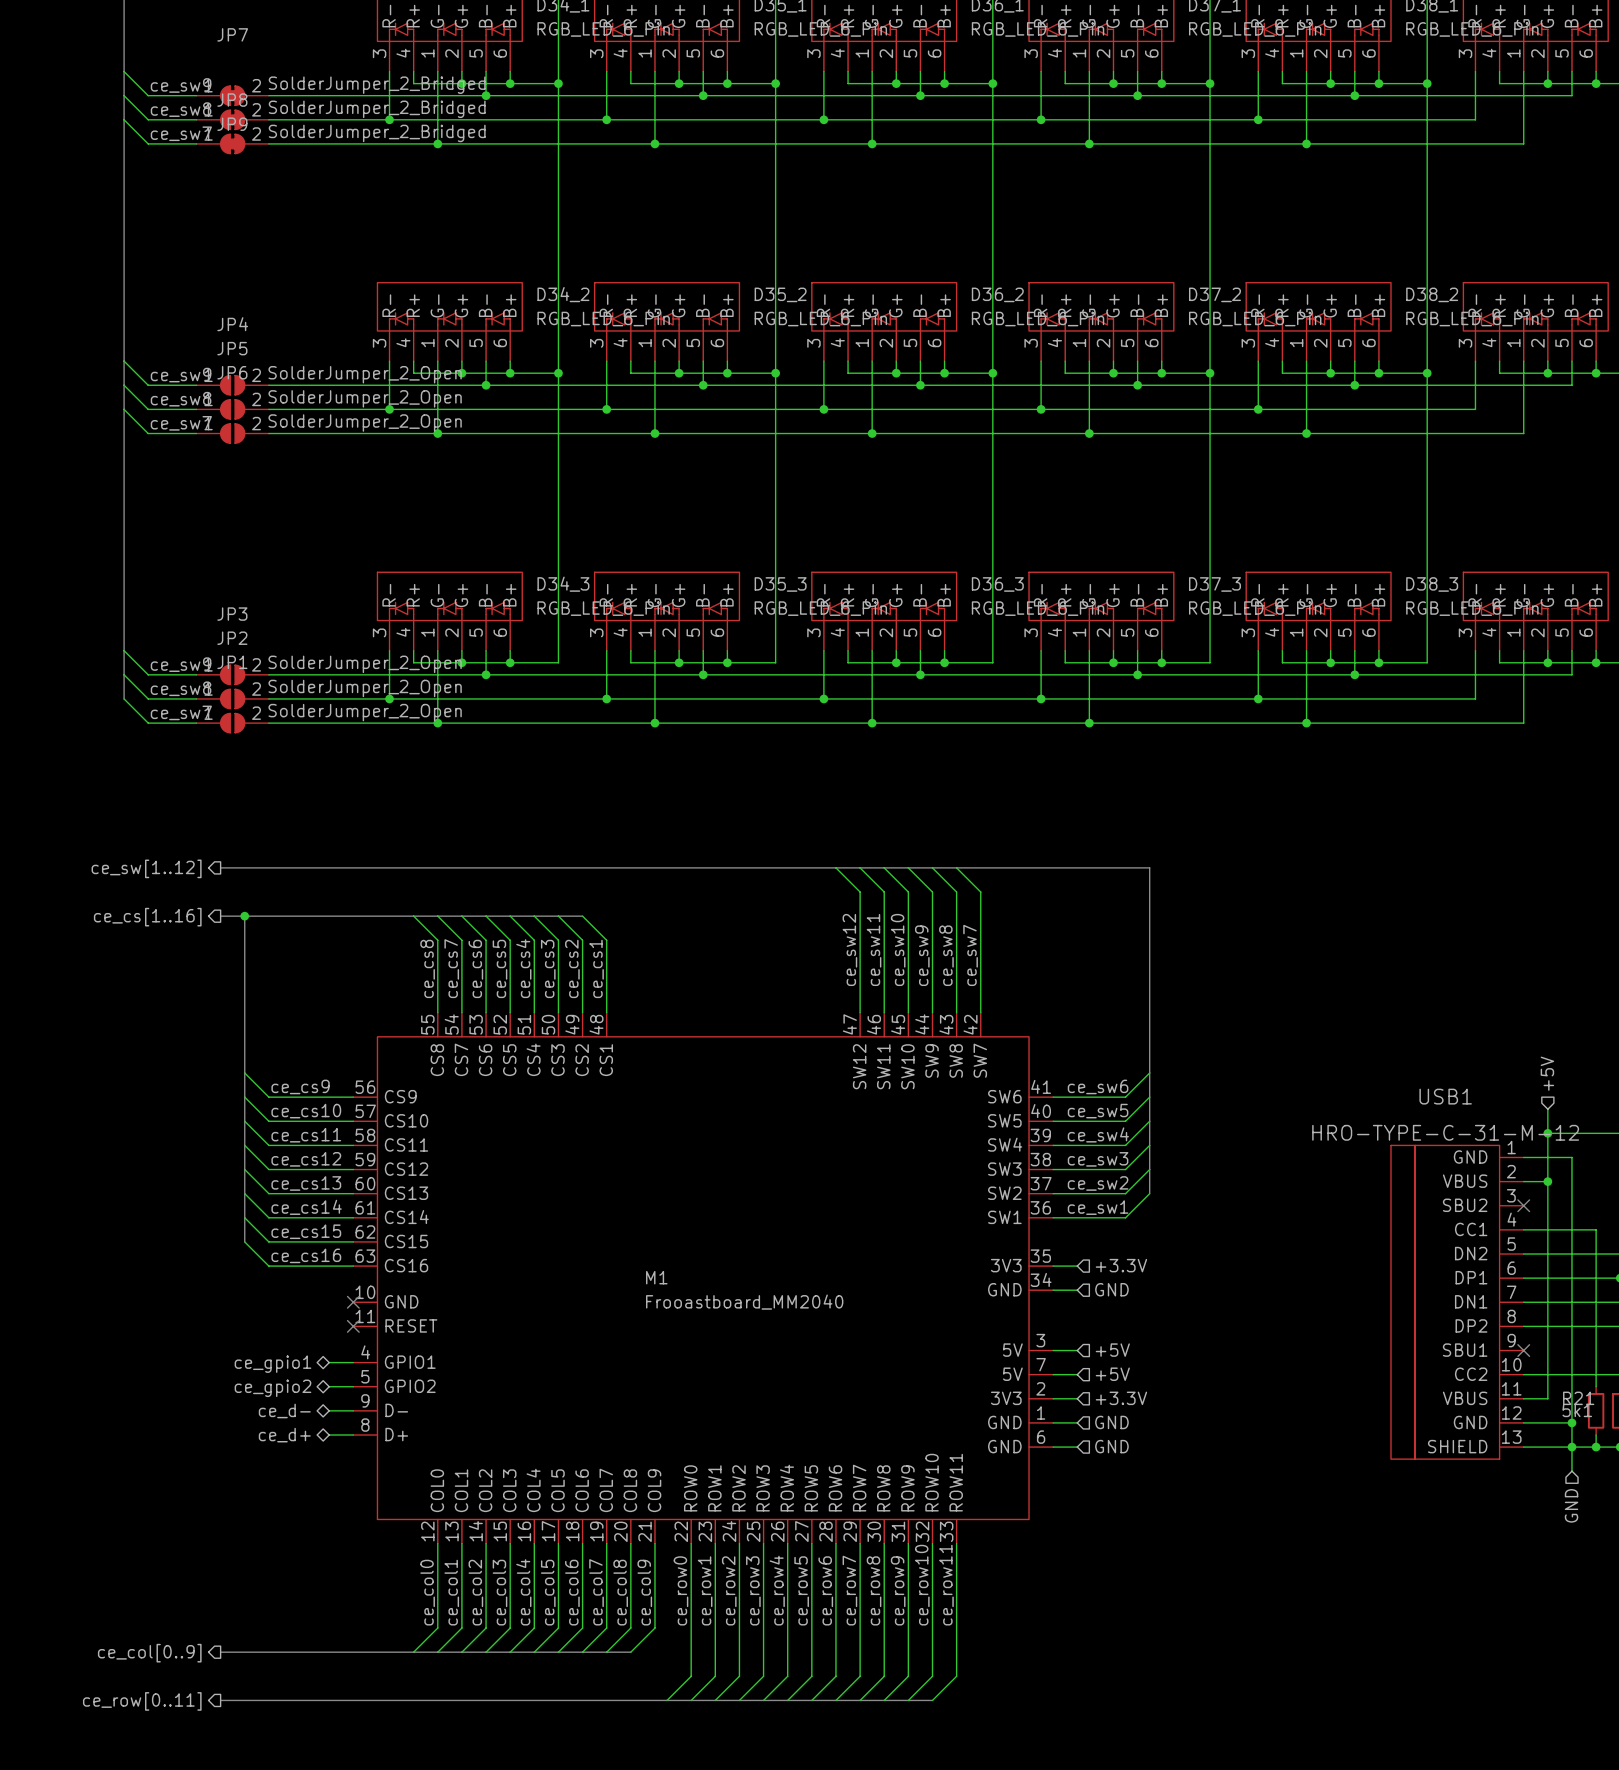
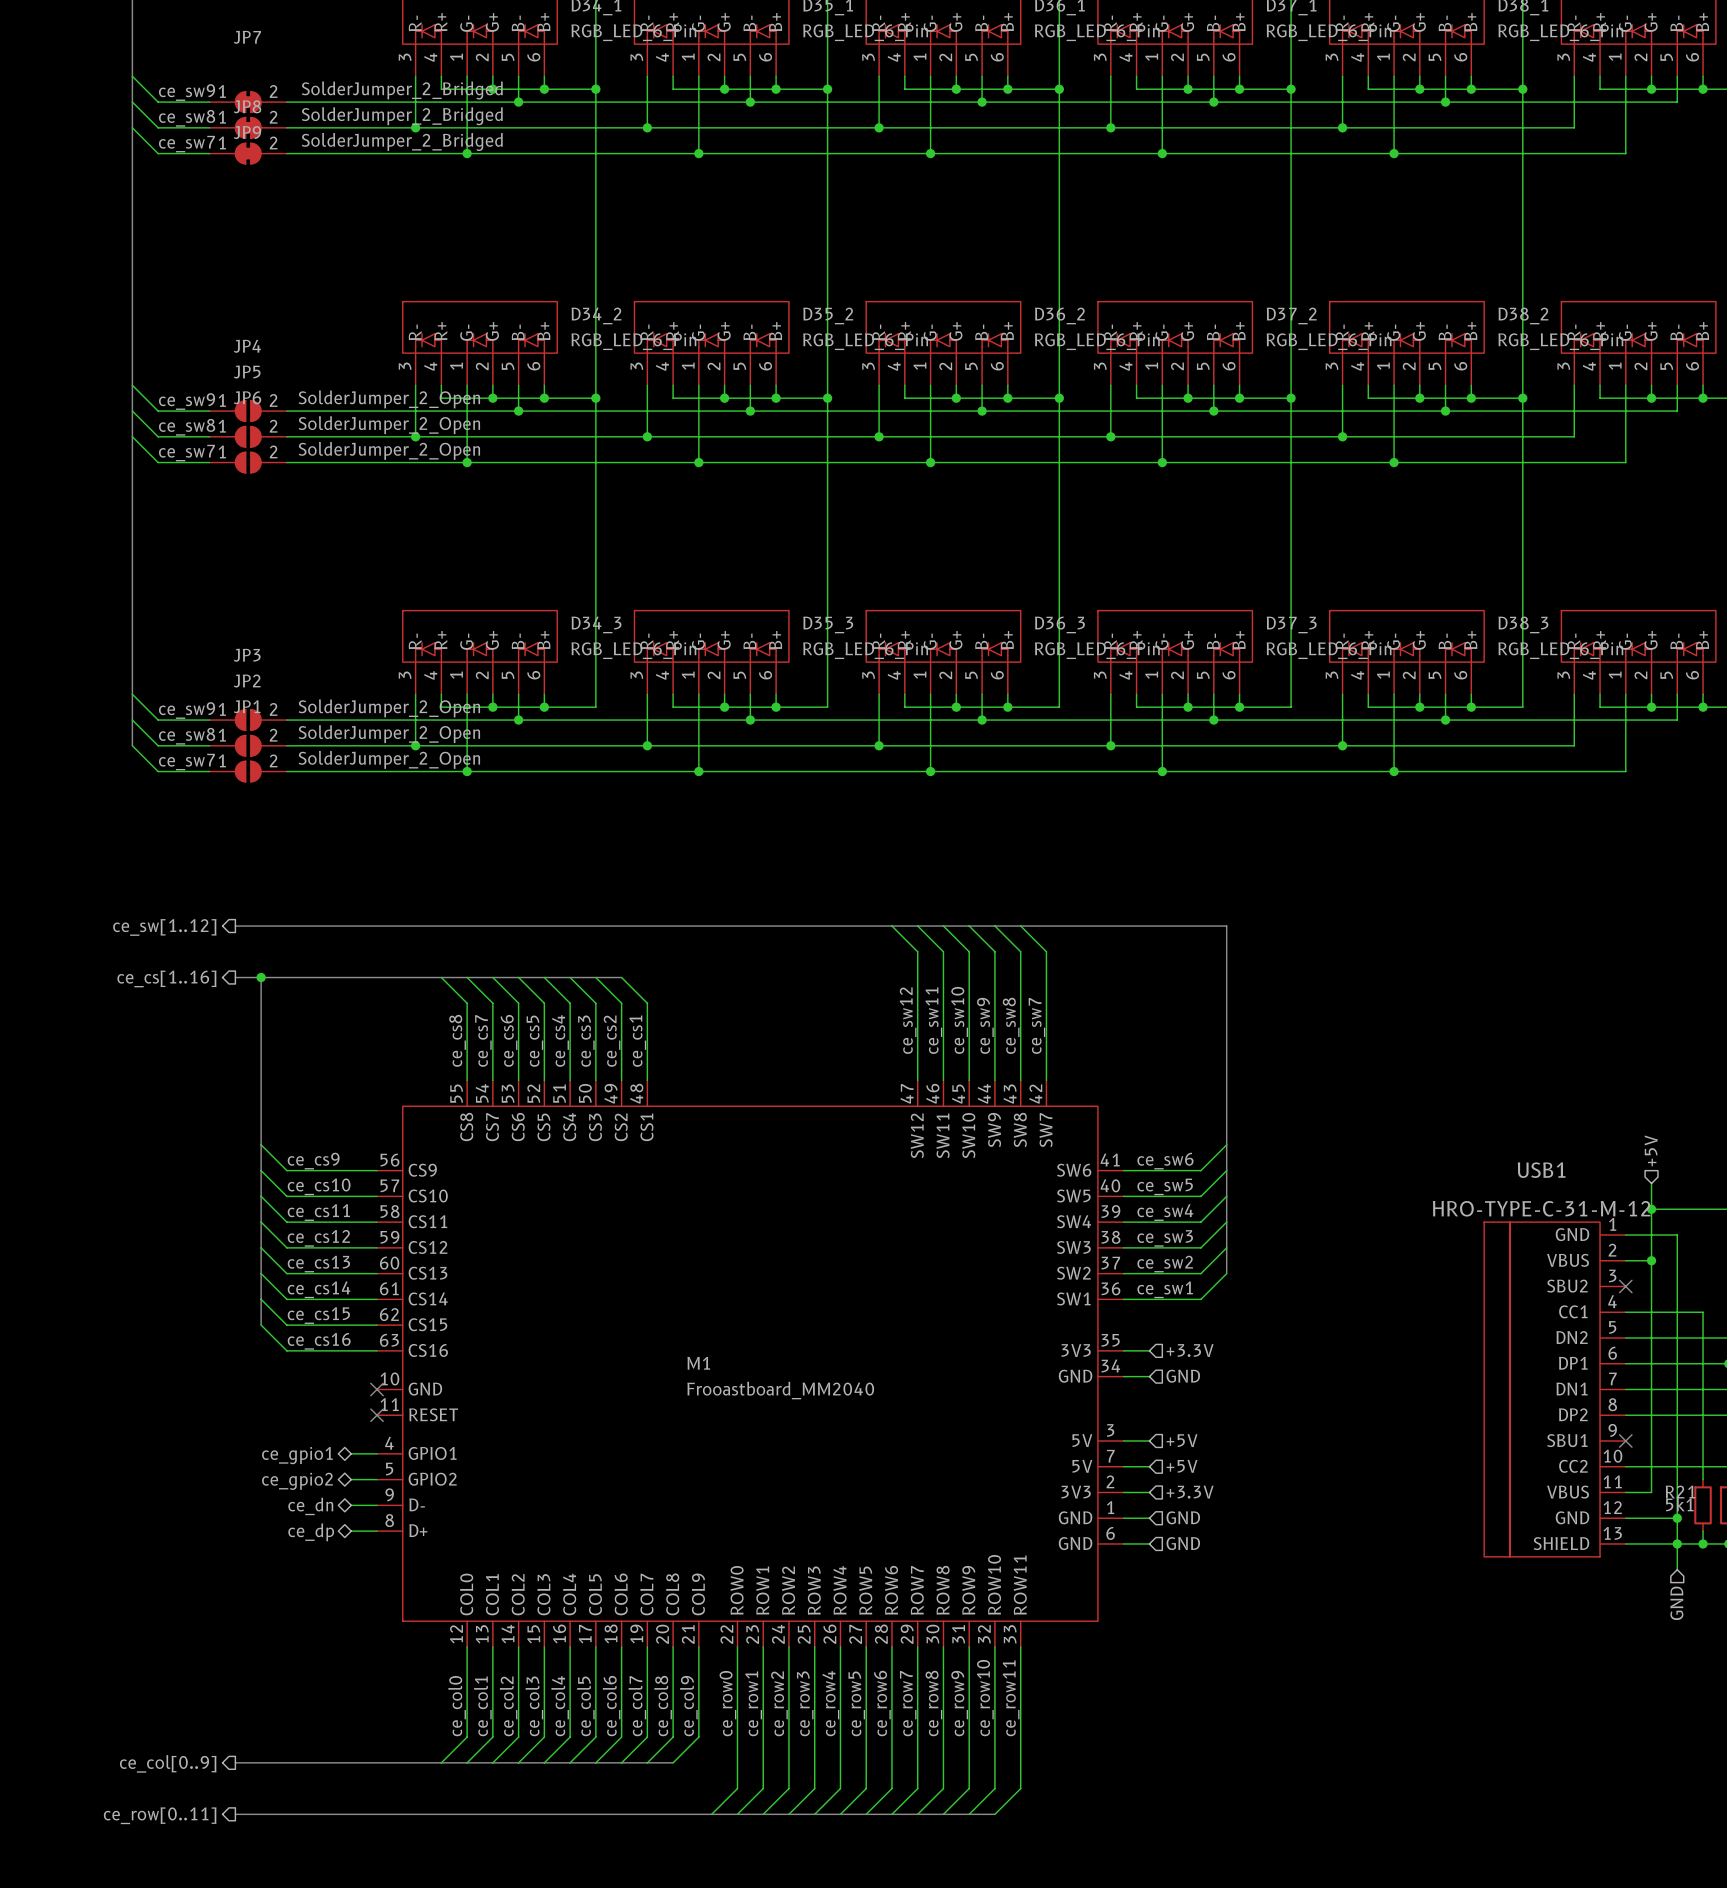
hierarchical label: ce_d- (284, 1410) -> ce_dn (310, 1506)
hierarchical label: ce_d+ (284, 1435) -> ce_dp (311, 1532)

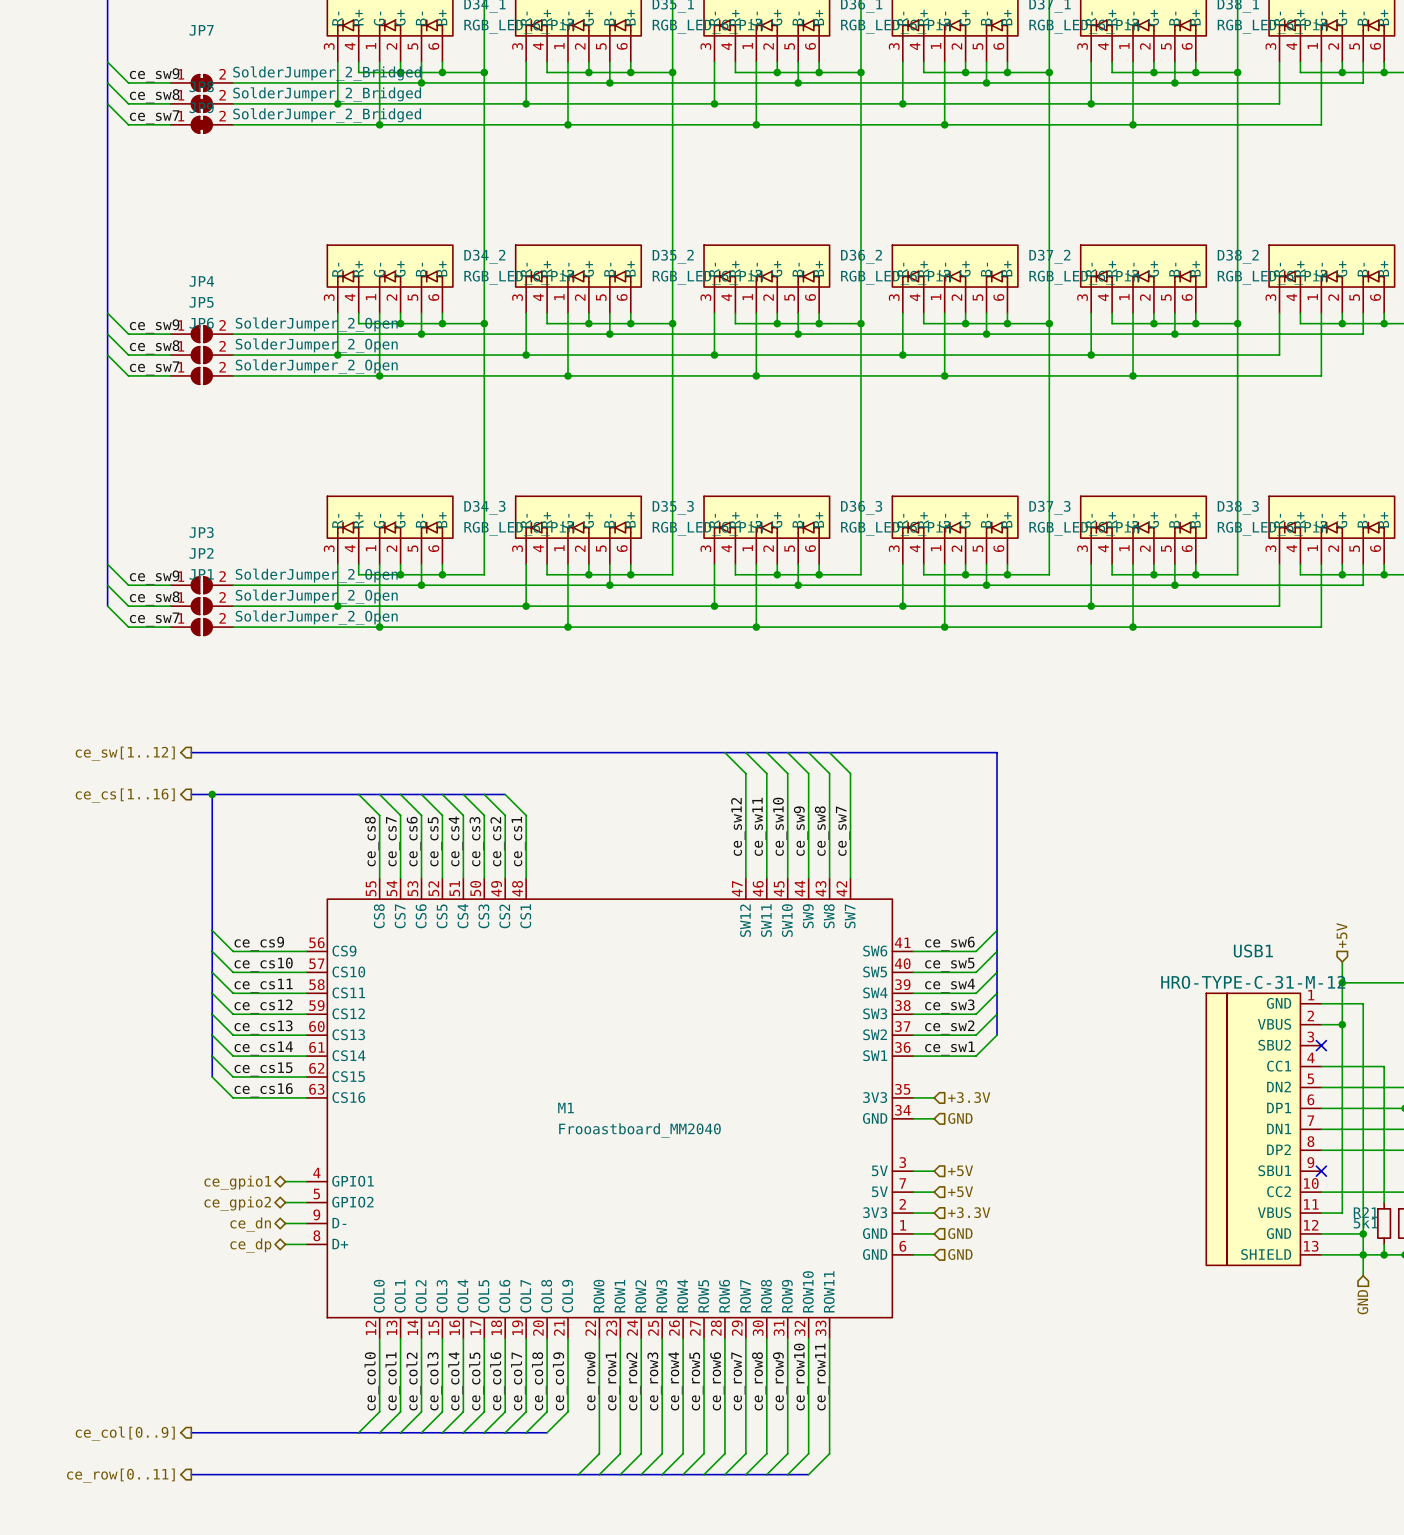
M1 symbol: [377, 1080, 1124, 1647] -> [306, 878, 914, 1339]
no-connect mark: (377, 1389) -> none
no-connect mark: (377, 1415) -> none

